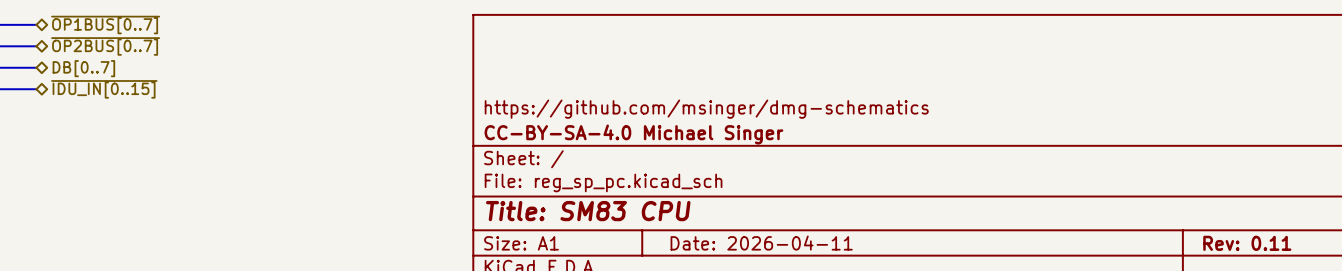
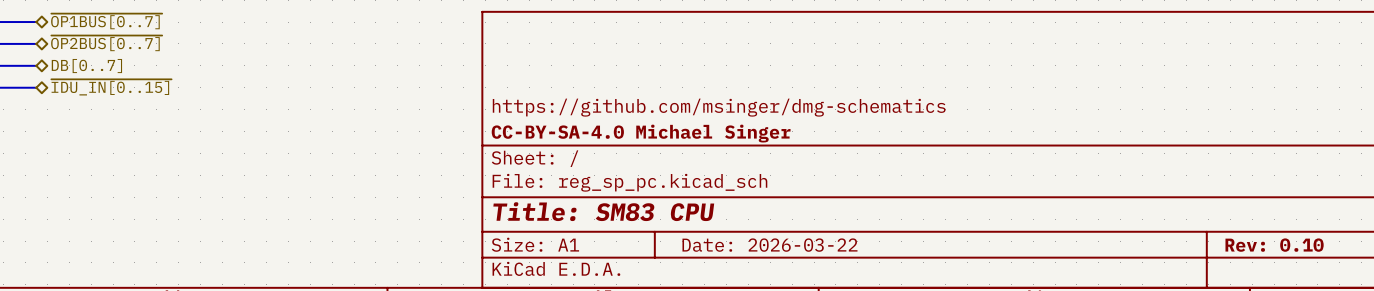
title block: Date: 2026-04-11 (761, 243) -> Date: 2026-03-22 (769, 245)
title block: Rev: 0.11 (1247, 243) -> Rev: 0.10 (1274, 245)

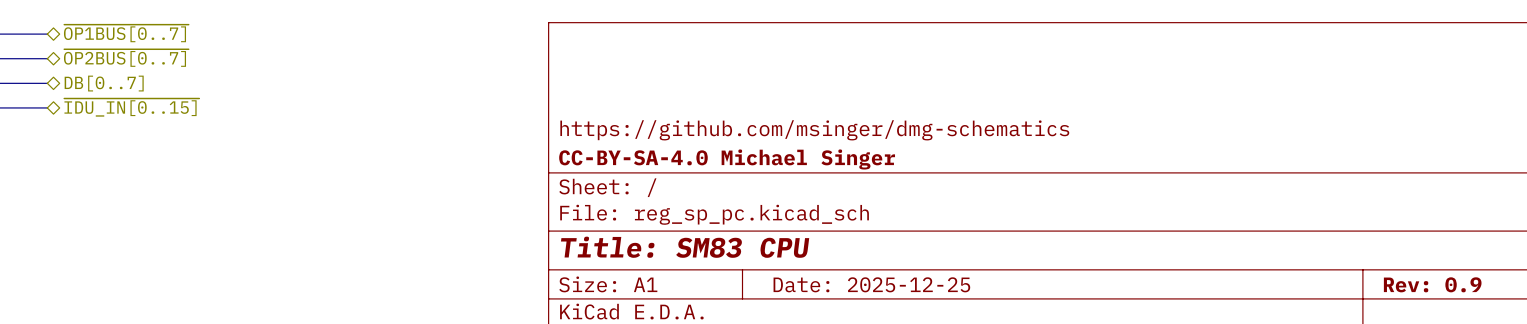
title block: Date: 2026-03-22 (769, 245) -> Date: 2025-12-25 (871, 284)
title block: Rev: 0.10 (1274, 245) -> Rev: 0.9 (1432, 284)

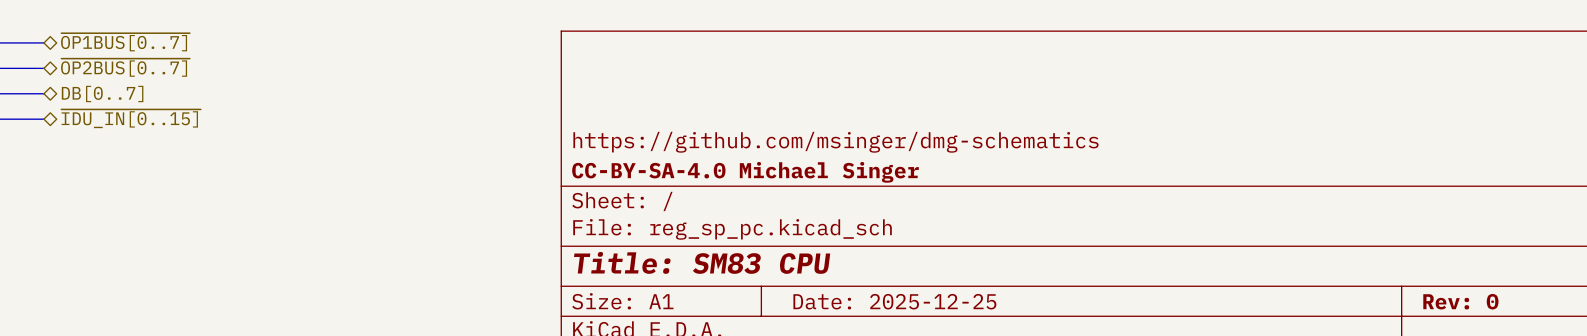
title block: Rev: 0.9 (1432, 284) -> Rev: 0 (1460, 301)

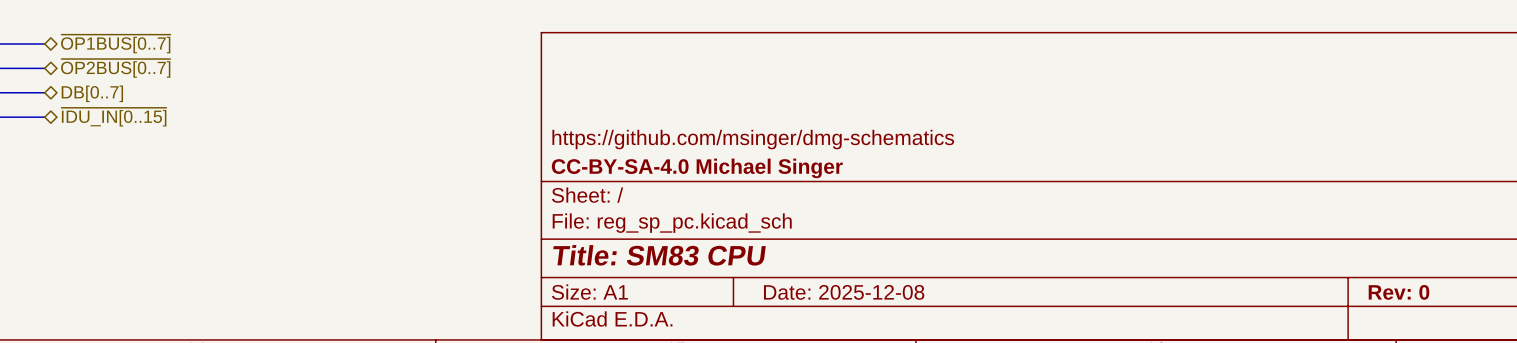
title block: Date: 2025-12-25 (894, 301) -> Date: 2025-12-08 (844, 292)

